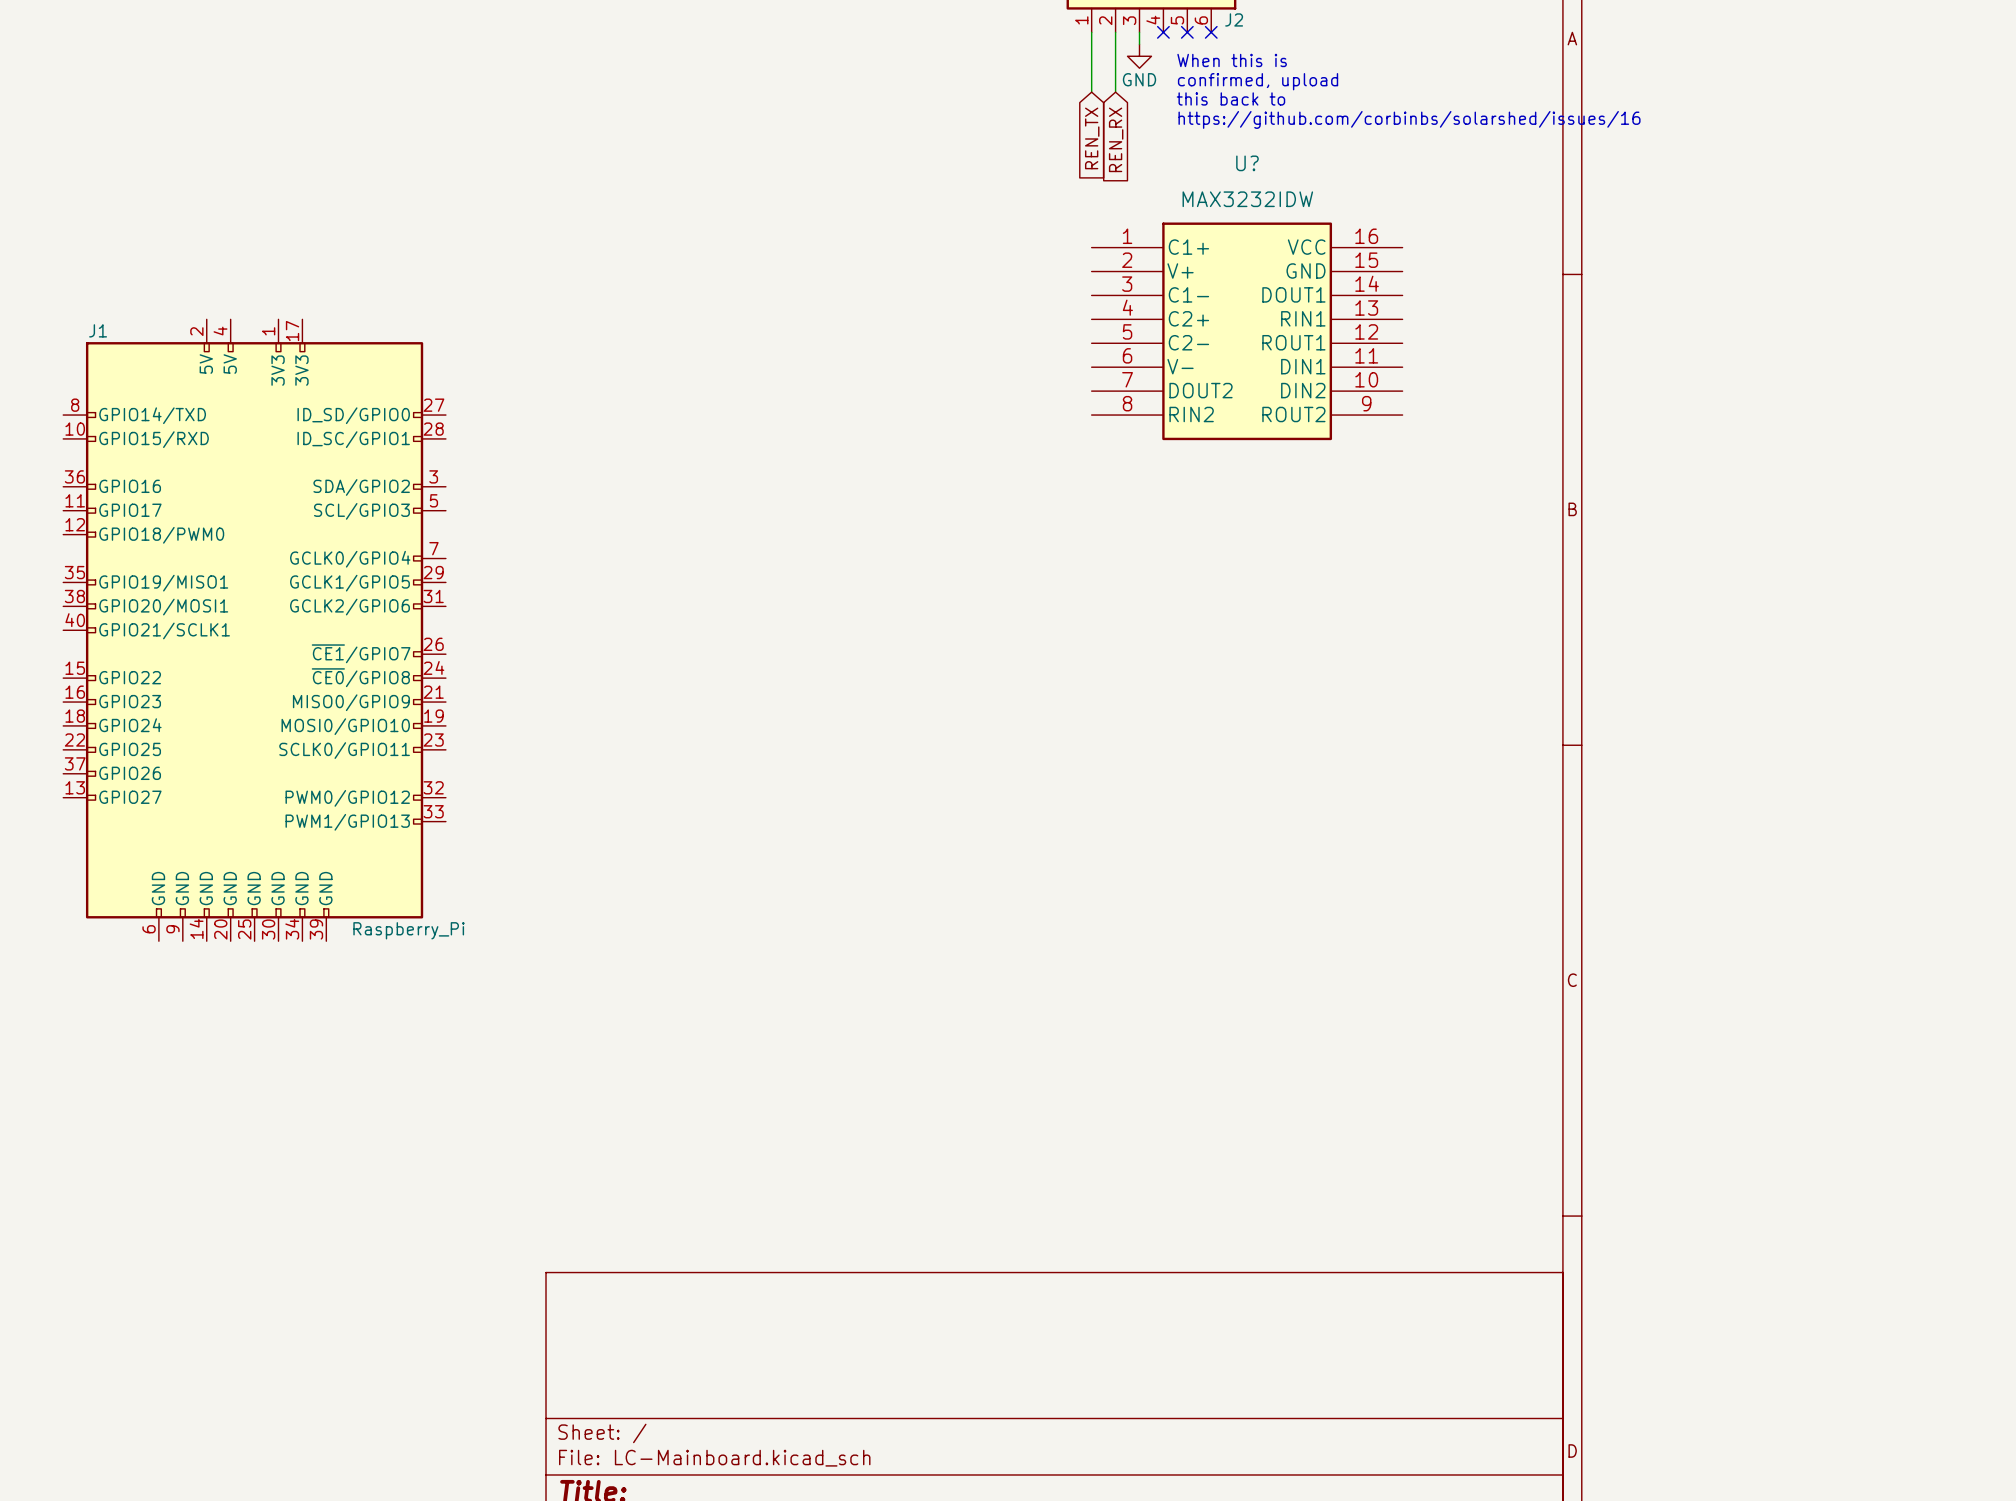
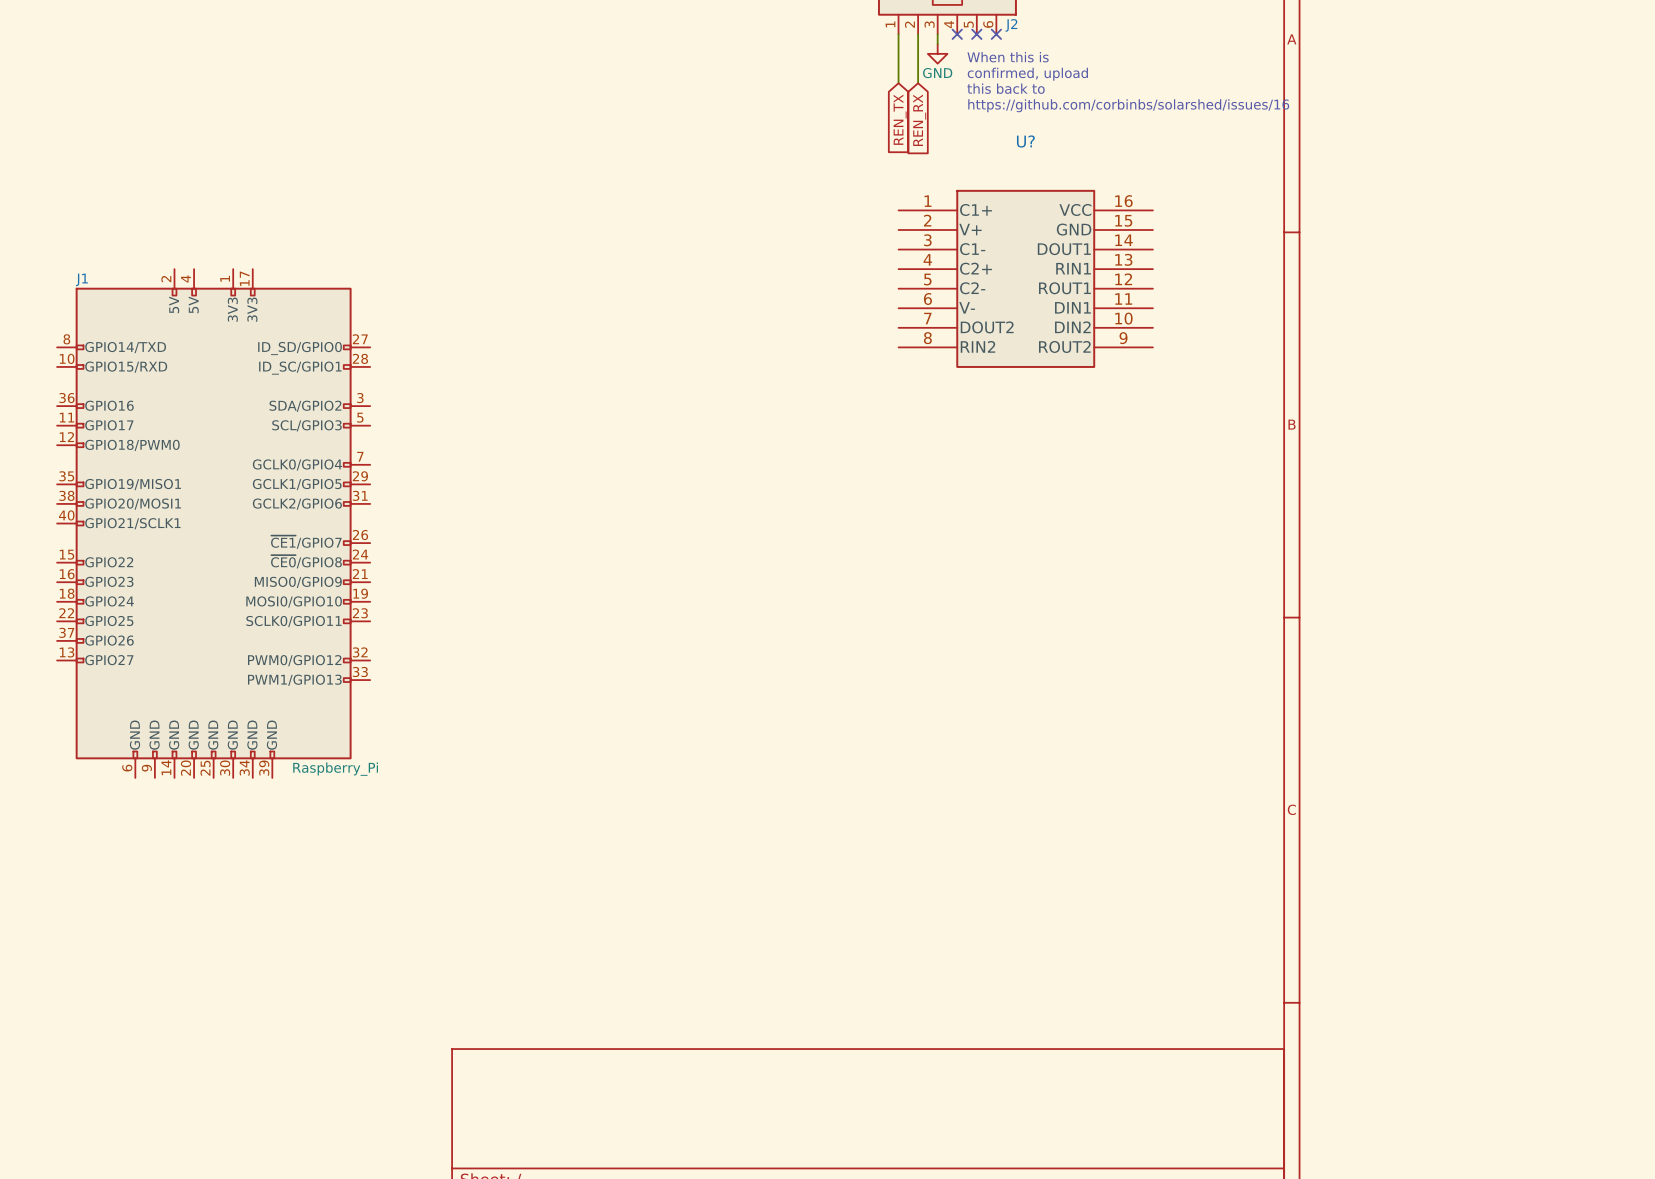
U? value: MAX3232IDW (1247, 199) -> none

